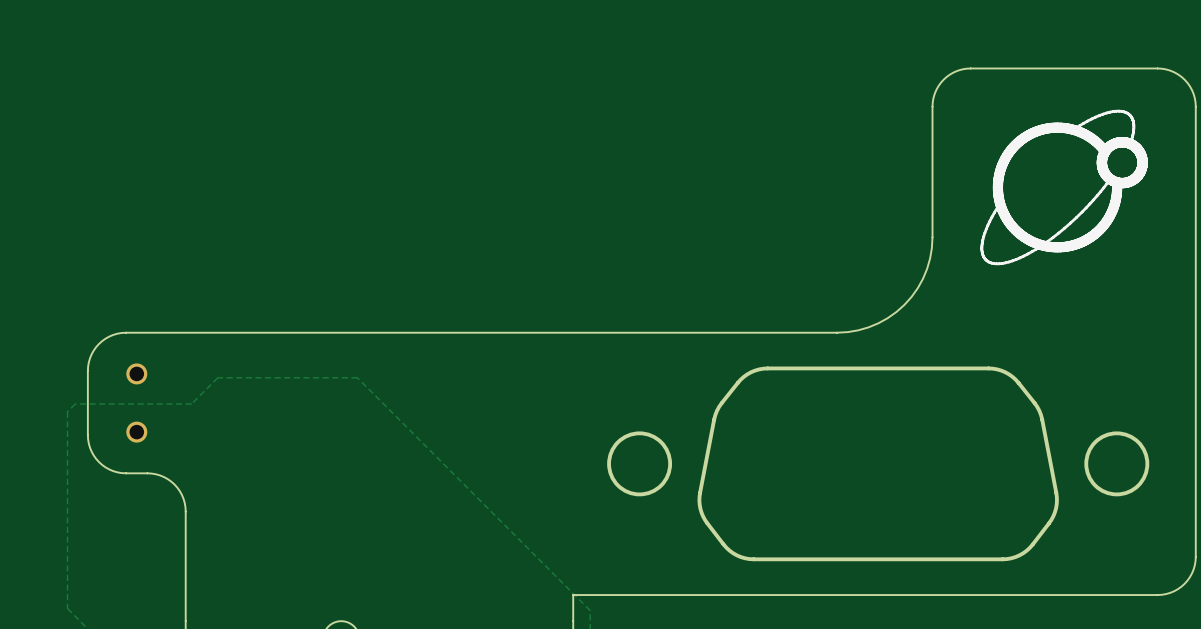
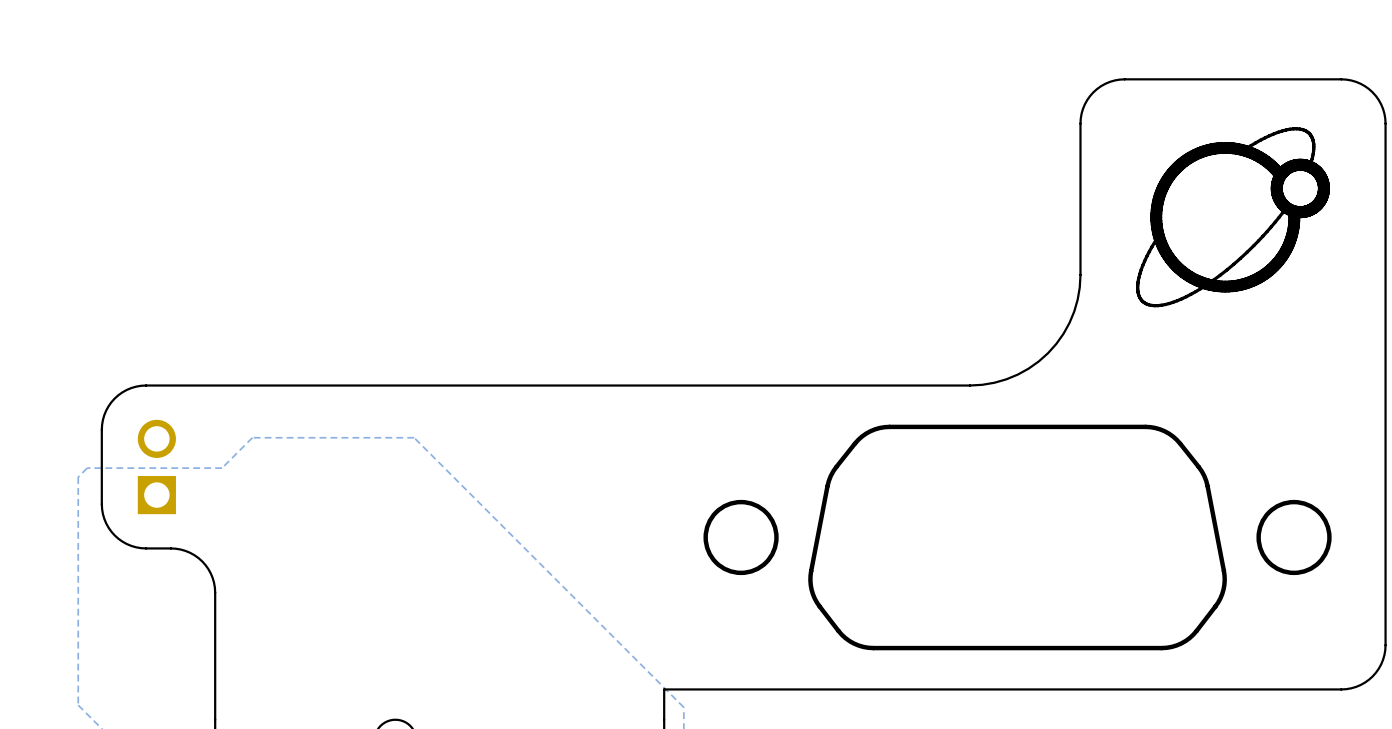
part: (136, 373) -> none
part: none -> (156, 466)
part: (136, 432) -> none

